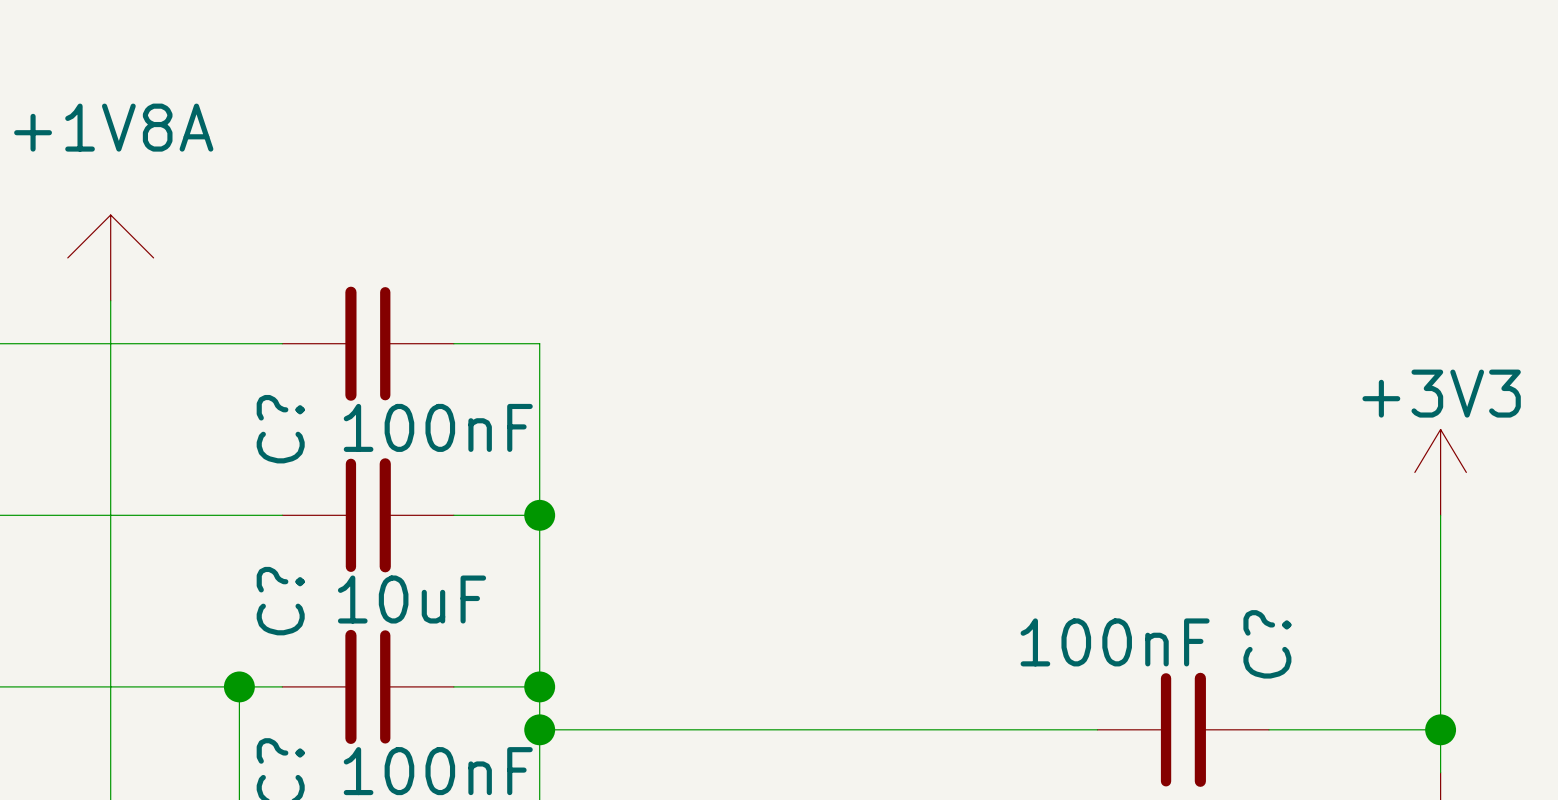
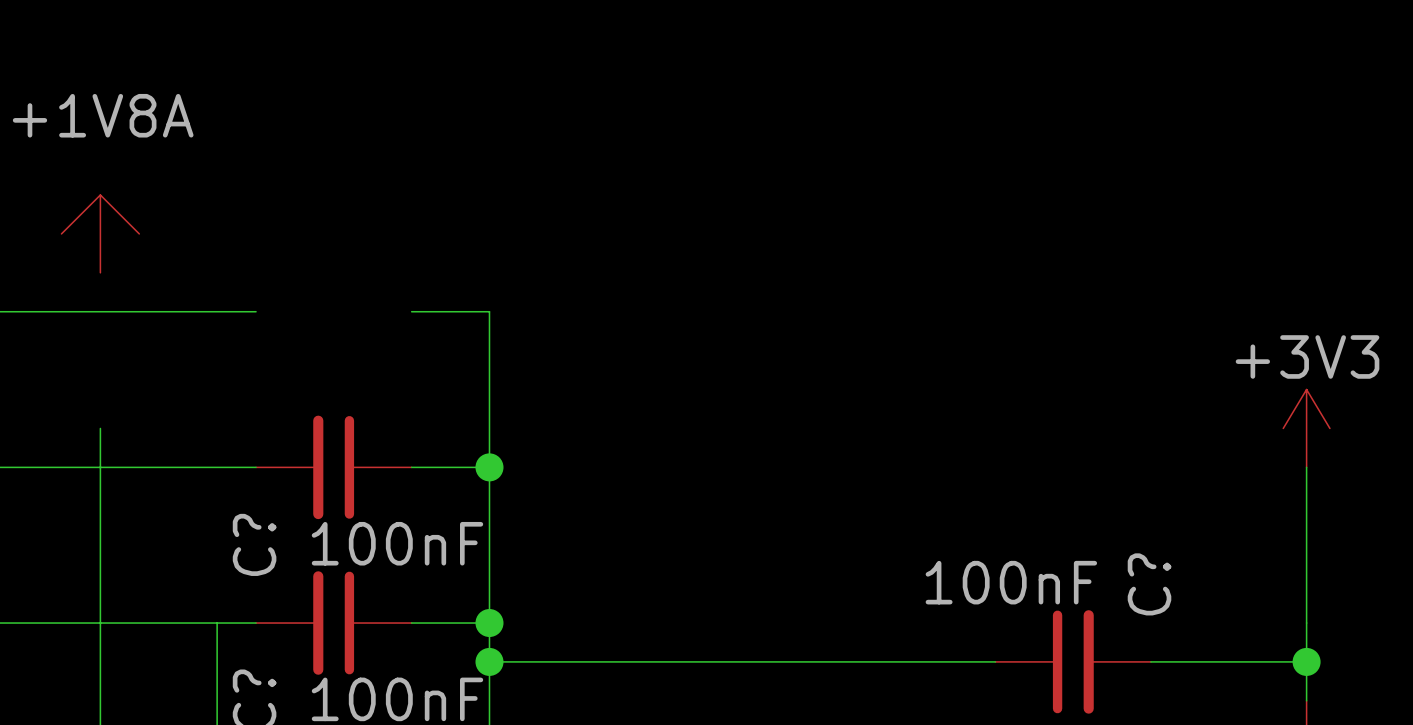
wire: (110, 300) (110, 472) -> none
C?: 100nF (368, 343) -> none
C? rotation: 0° (368, 515) -> 180° (333, 467)
C? value: 10uF (412, 599) -> 100nF (397, 543)
junction: (239, 686) -> none

